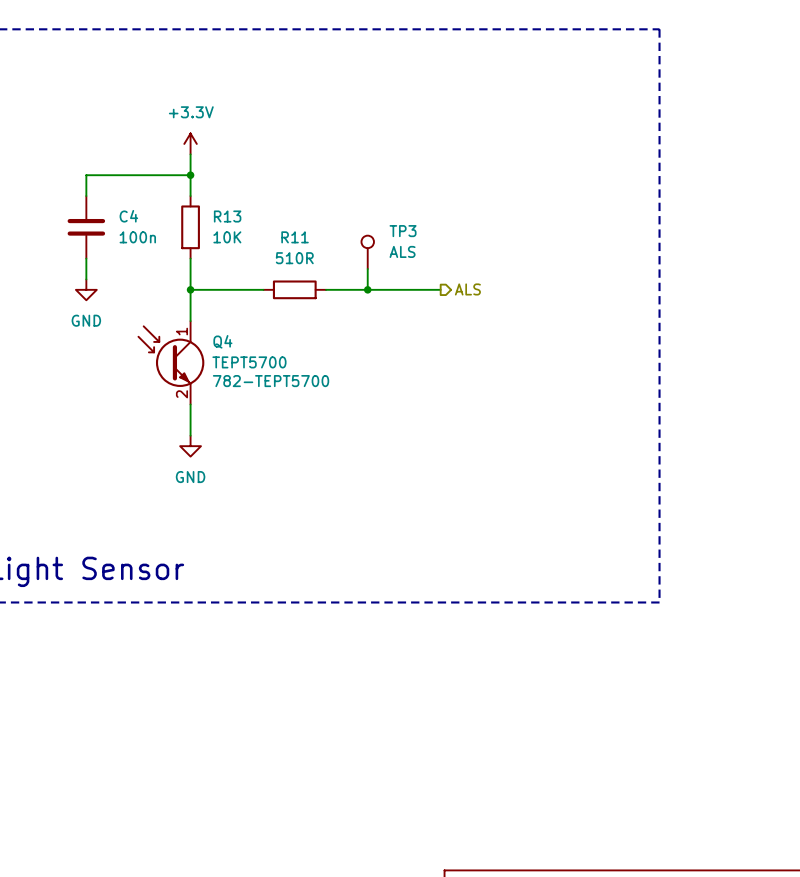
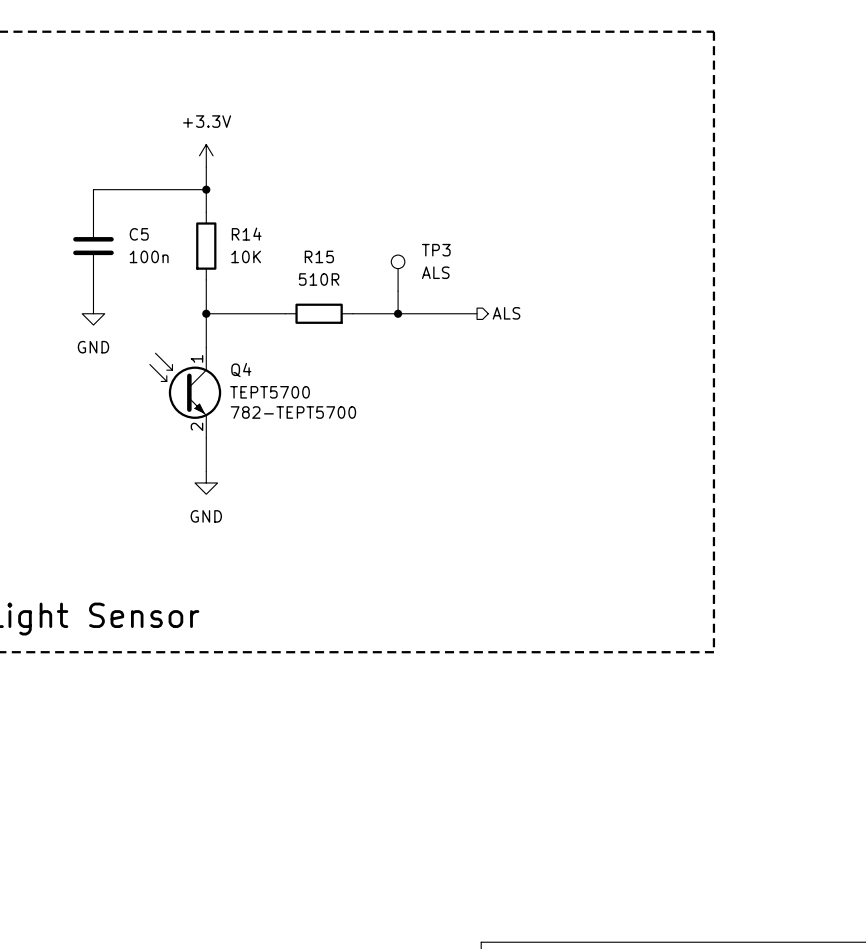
C4 name: C4 (128, 216) -> C5 (139, 234)
R13 name: R13 (227, 216) -> R14 (246, 234)
R11 name: R11 (295, 237) -> R15 (319, 256)

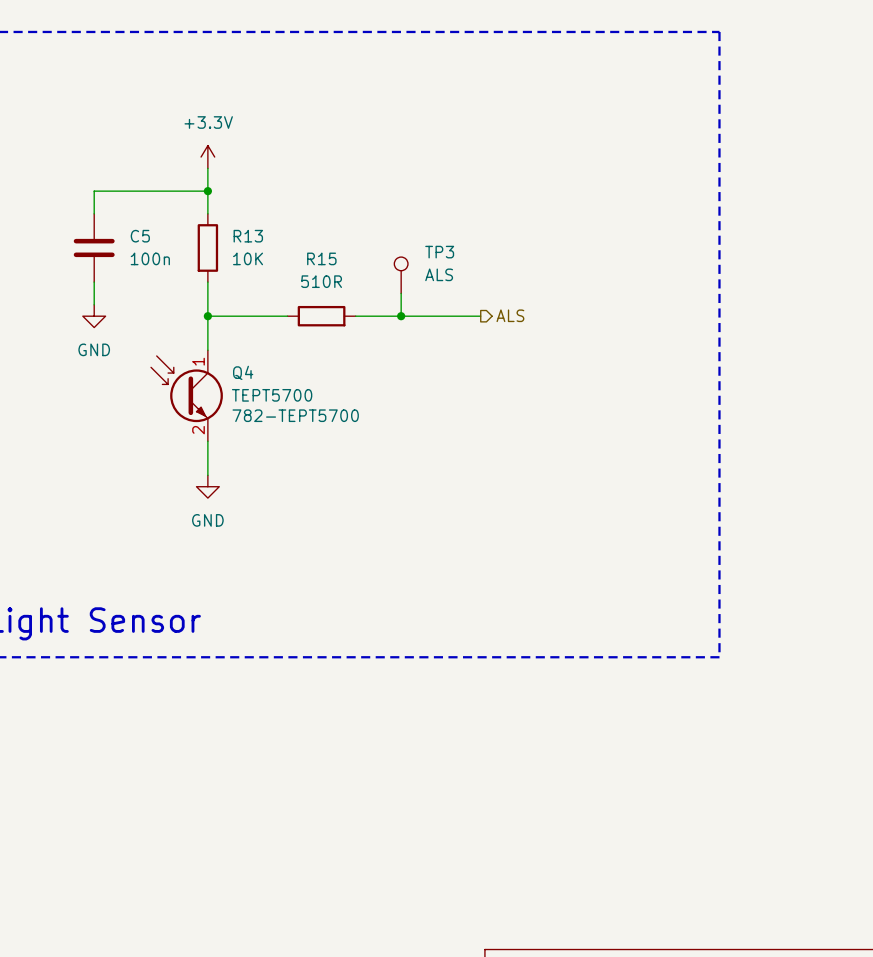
R14 name: R14 (246, 234) -> R13 (248, 236)

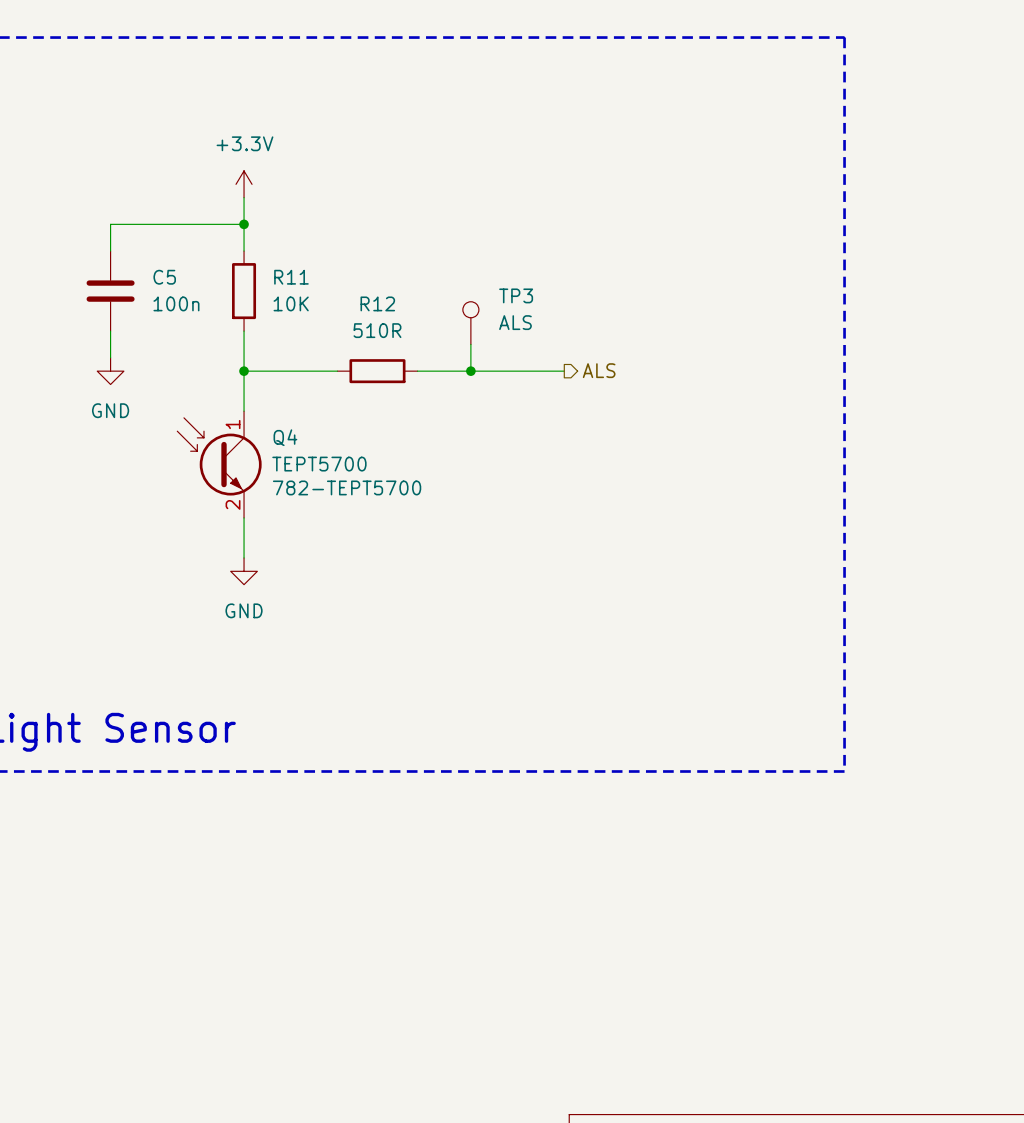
R13 name: R13 (248, 236) -> R11 (291, 277)
R15 name: R15 (321, 258) -> R12 (377, 303)

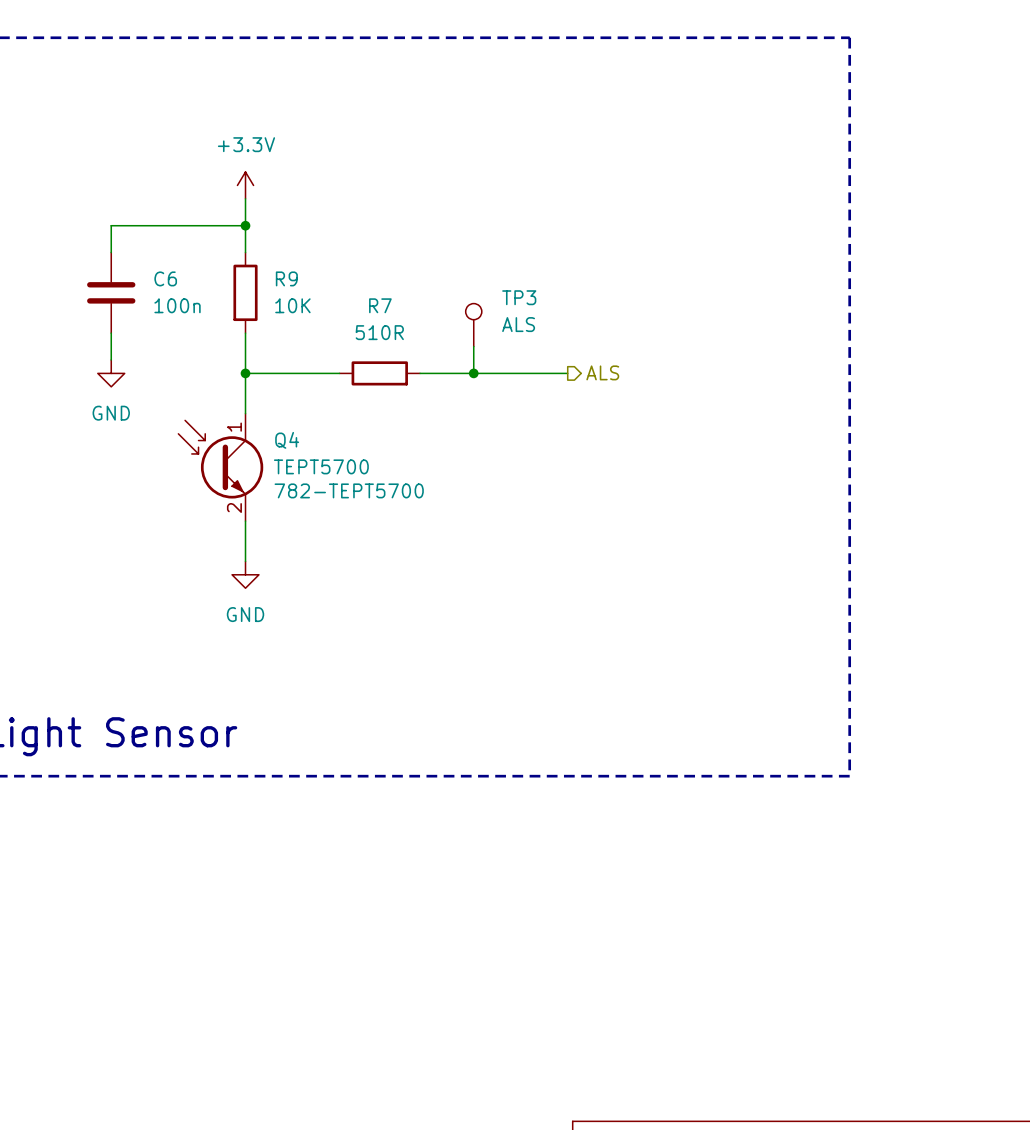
C5 name: C5 (164, 277) -> C6 (165, 278)
R11 name: R11 (291, 277) -> R9 (286, 278)
R12 name: R12 (377, 303) -> R7 (380, 305)

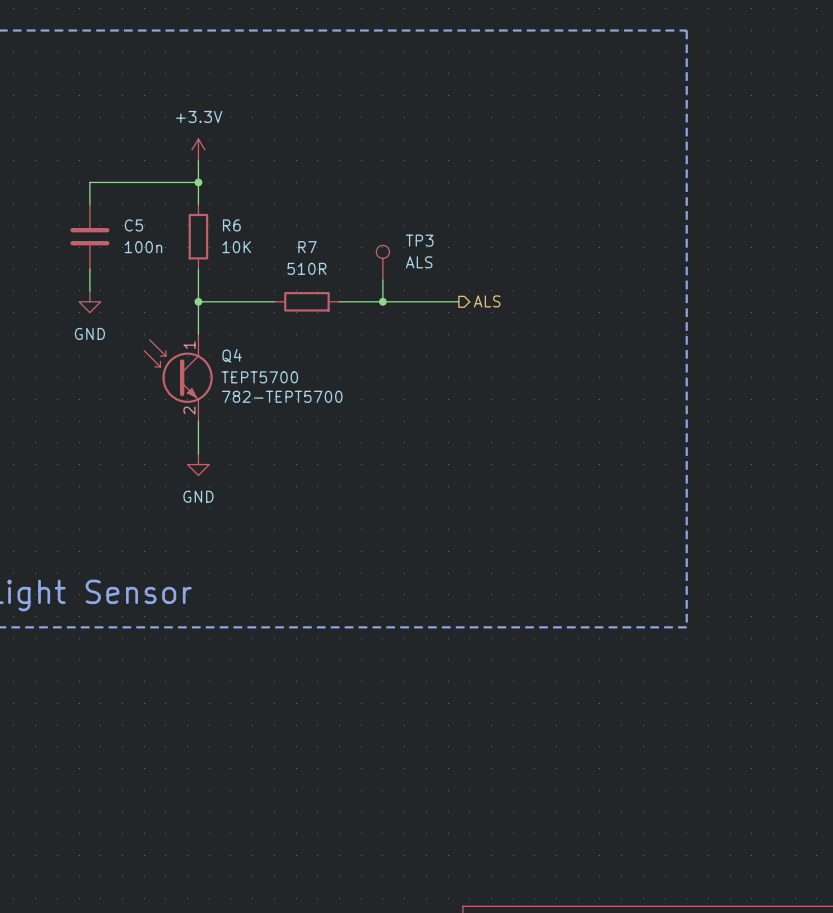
C6 name: C6 (165, 278) -> C5 (133, 225)
R9 name: R9 (286, 278) -> R6 (231, 225)

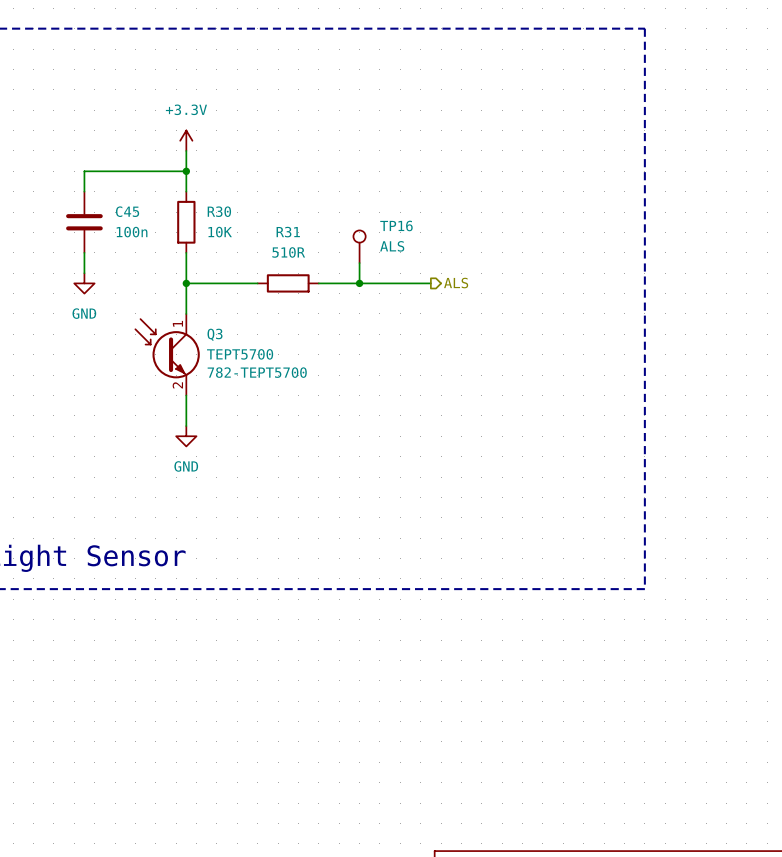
C5 name: C5 (133, 225) -> C45 (127, 211)
R6 name: R6 (231, 225) -> R30 (219, 211)
TP3 name: TP3 (419, 240) -> TP16 (396, 225)
R7 name: R7 (307, 247) -> R31 (288, 232)
Q4 name: Q4 (232, 355) -> Q3 (215, 334)

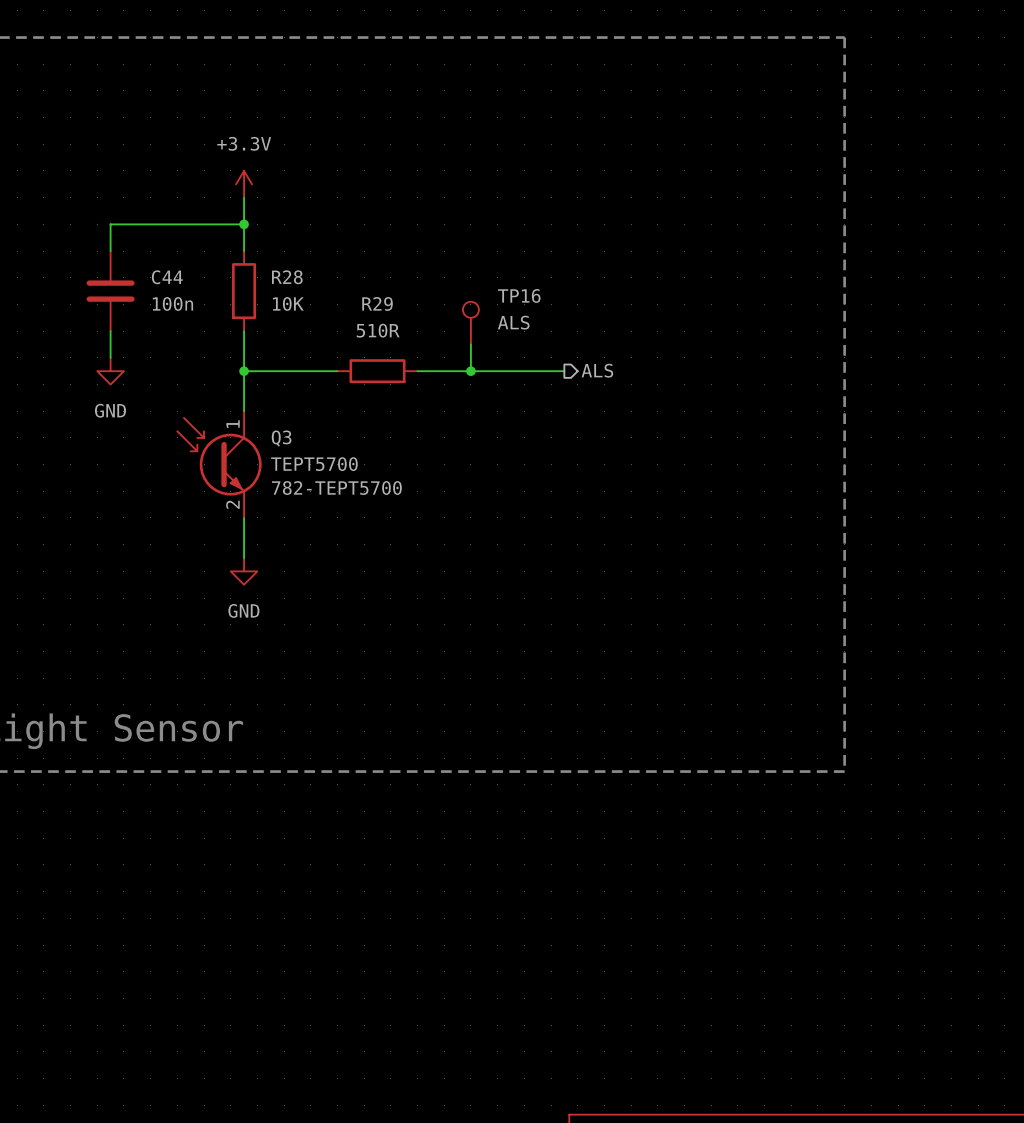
C45 name: C45 (127, 211) -> C44 (167, 277)
R30 name: R30 (219, 211) -> R28 (287, 277)
R31 name: R31 (288, 232) -> R29 (377, 303)

